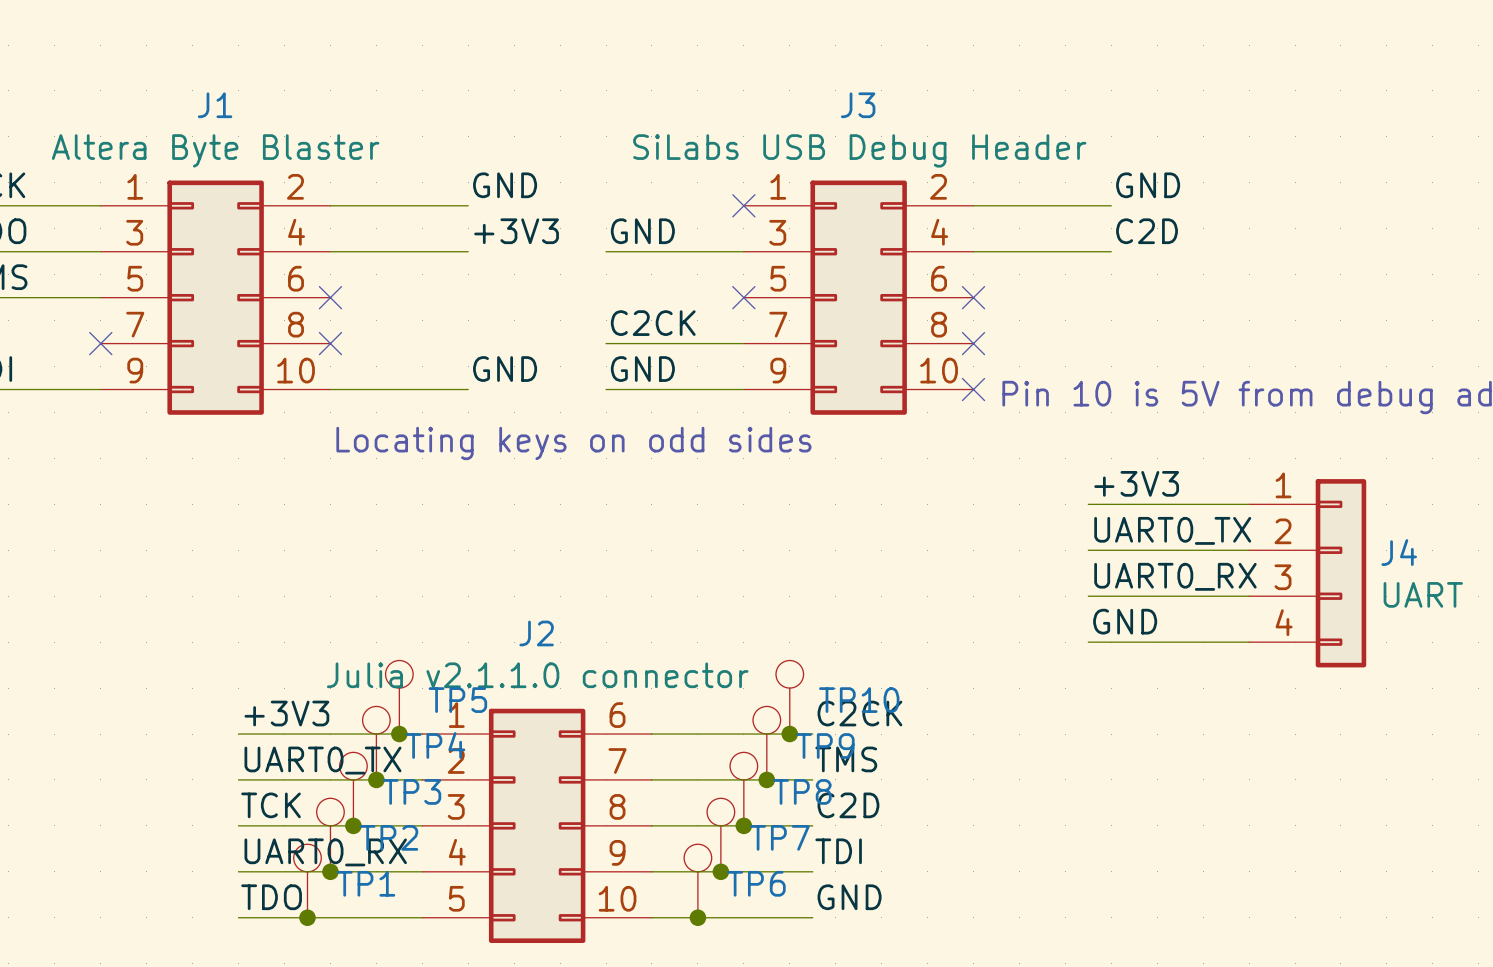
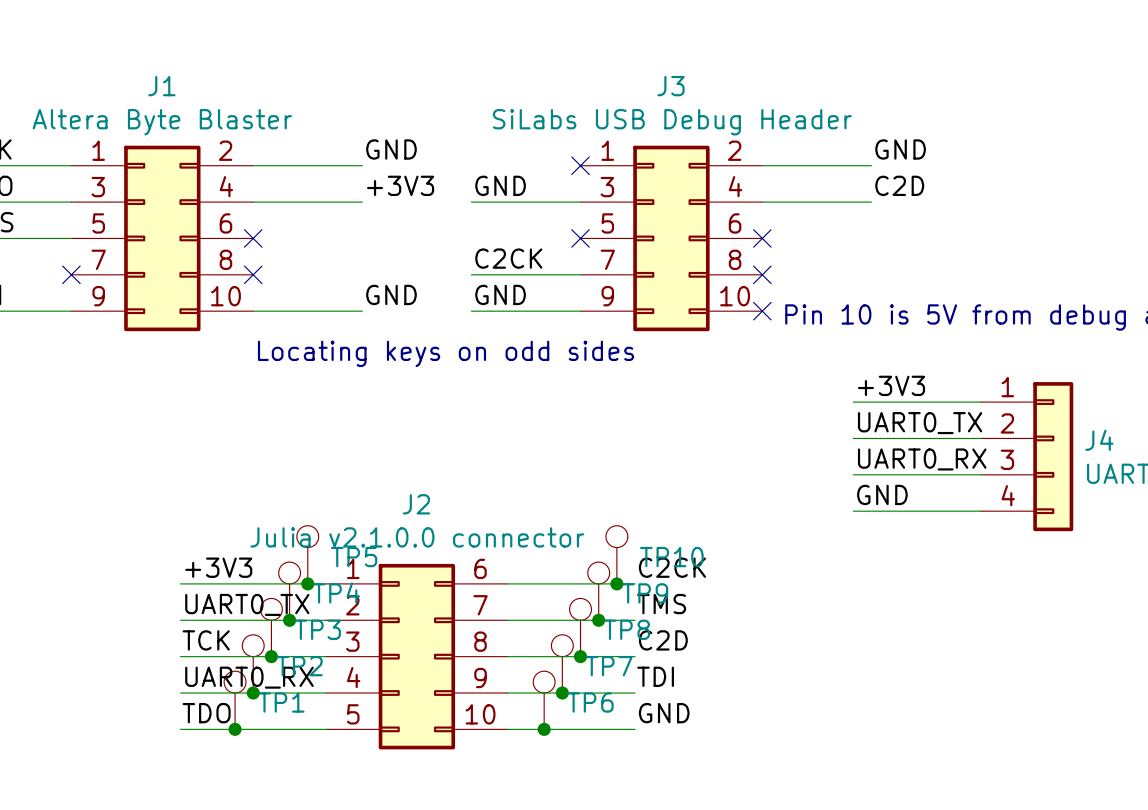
J2 value: Julia v2.1.1.0 connector (537, 675) -> Julia v2.1.0.0 connector (417, 537)

